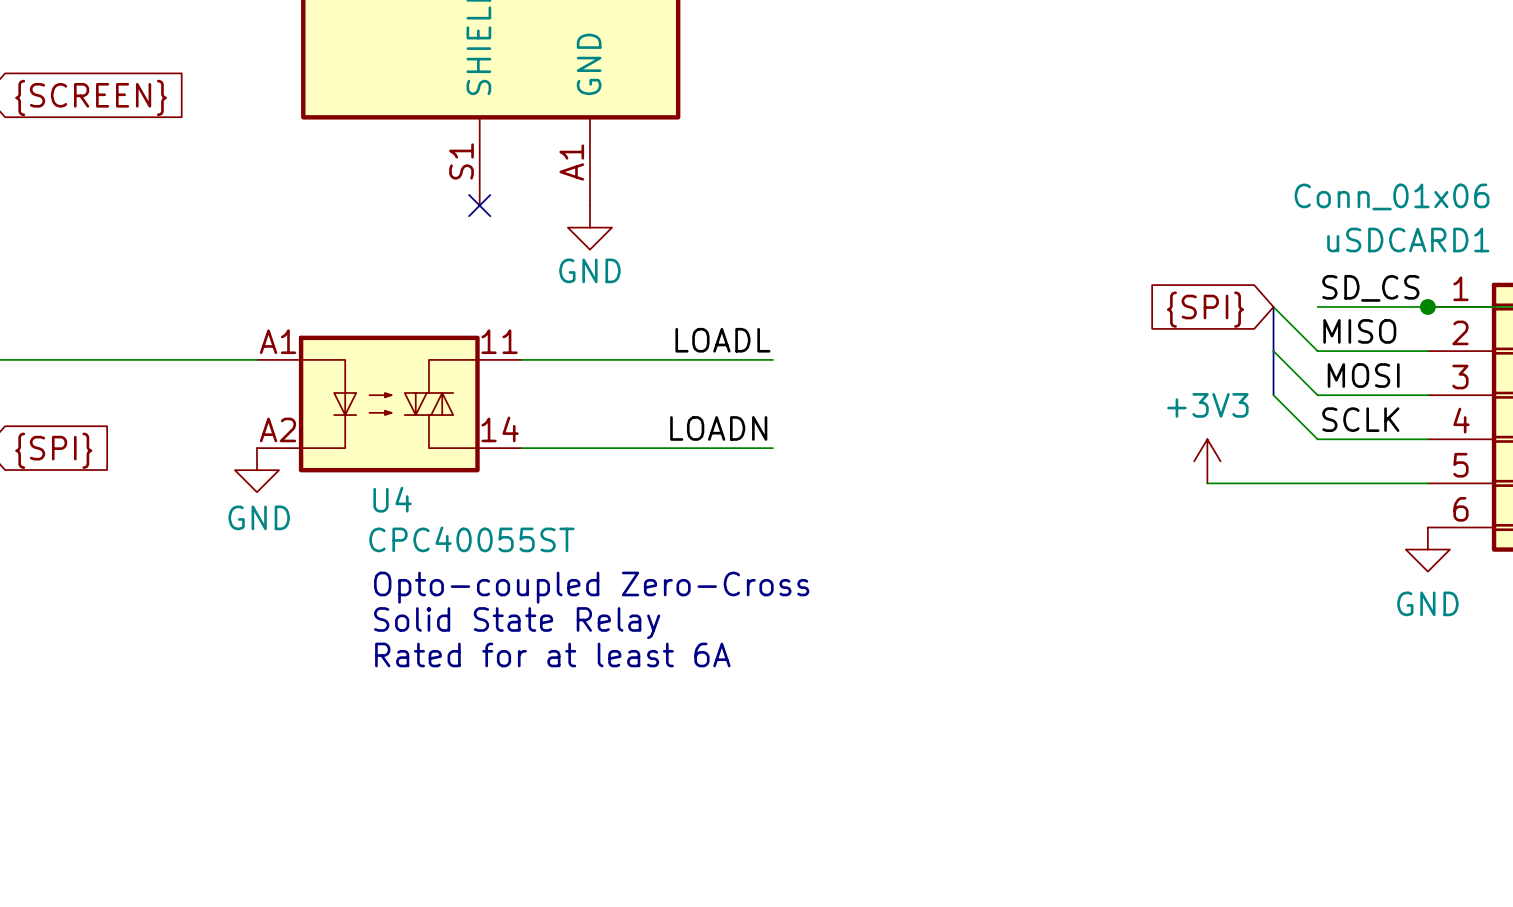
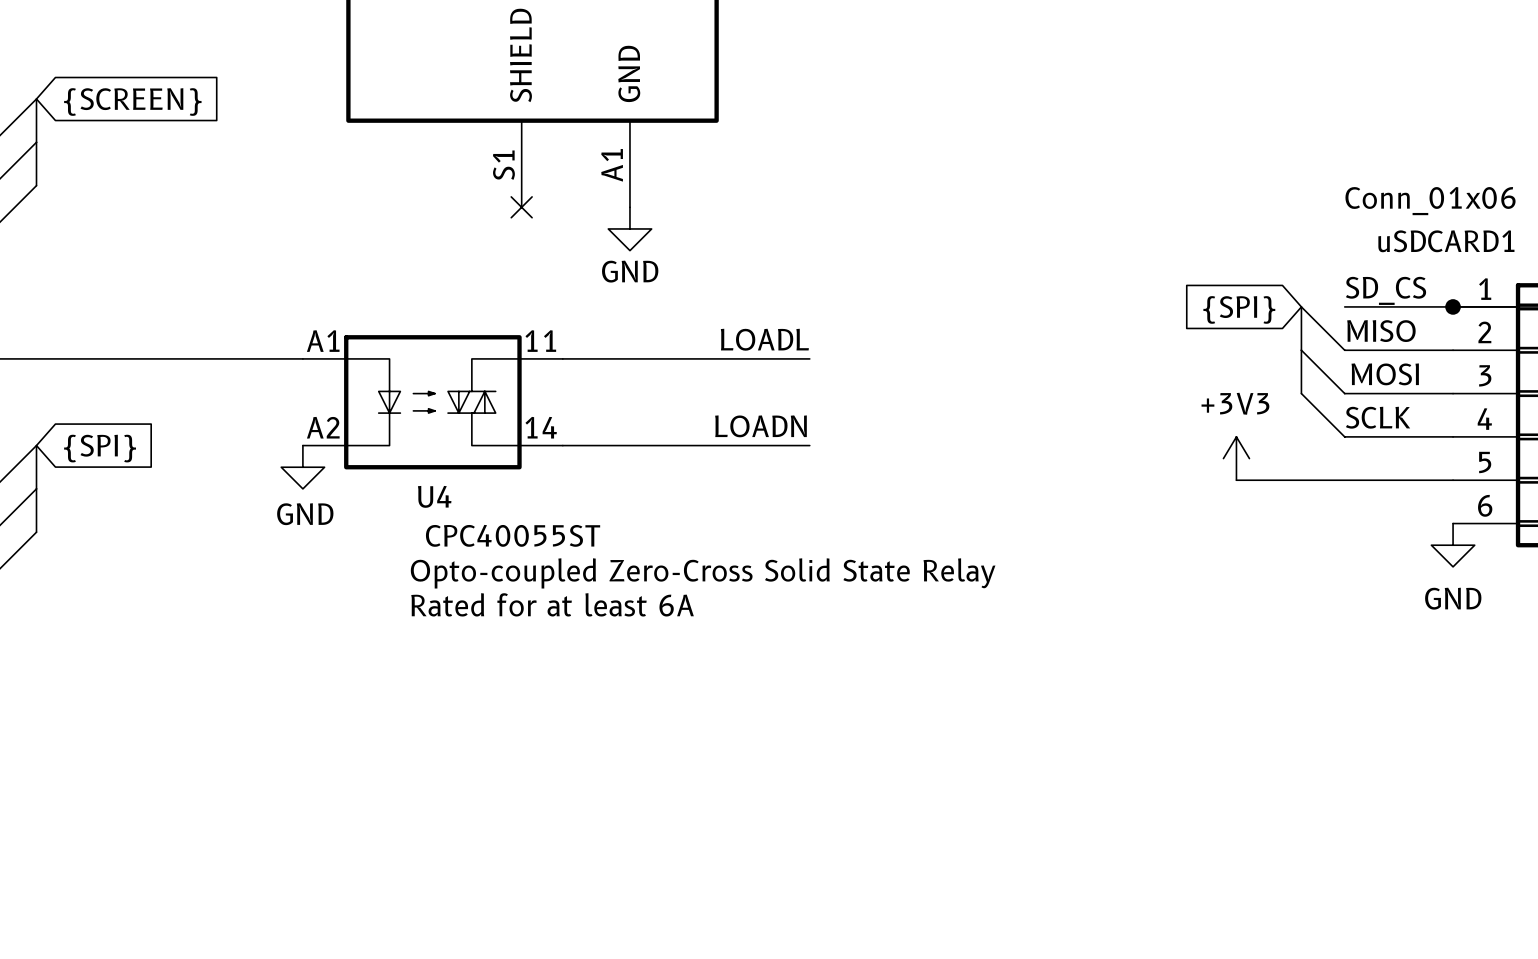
text: Opto-coupled Zero-Cross (591, 587) -> Opto-coupled Zero-Cross Solid State Relay (703, 573)
text: Solid State Relay (517, 623) -> Rated for at least 6A (552, 604)
text: Rated for at least 6A (552, 654) -> none

